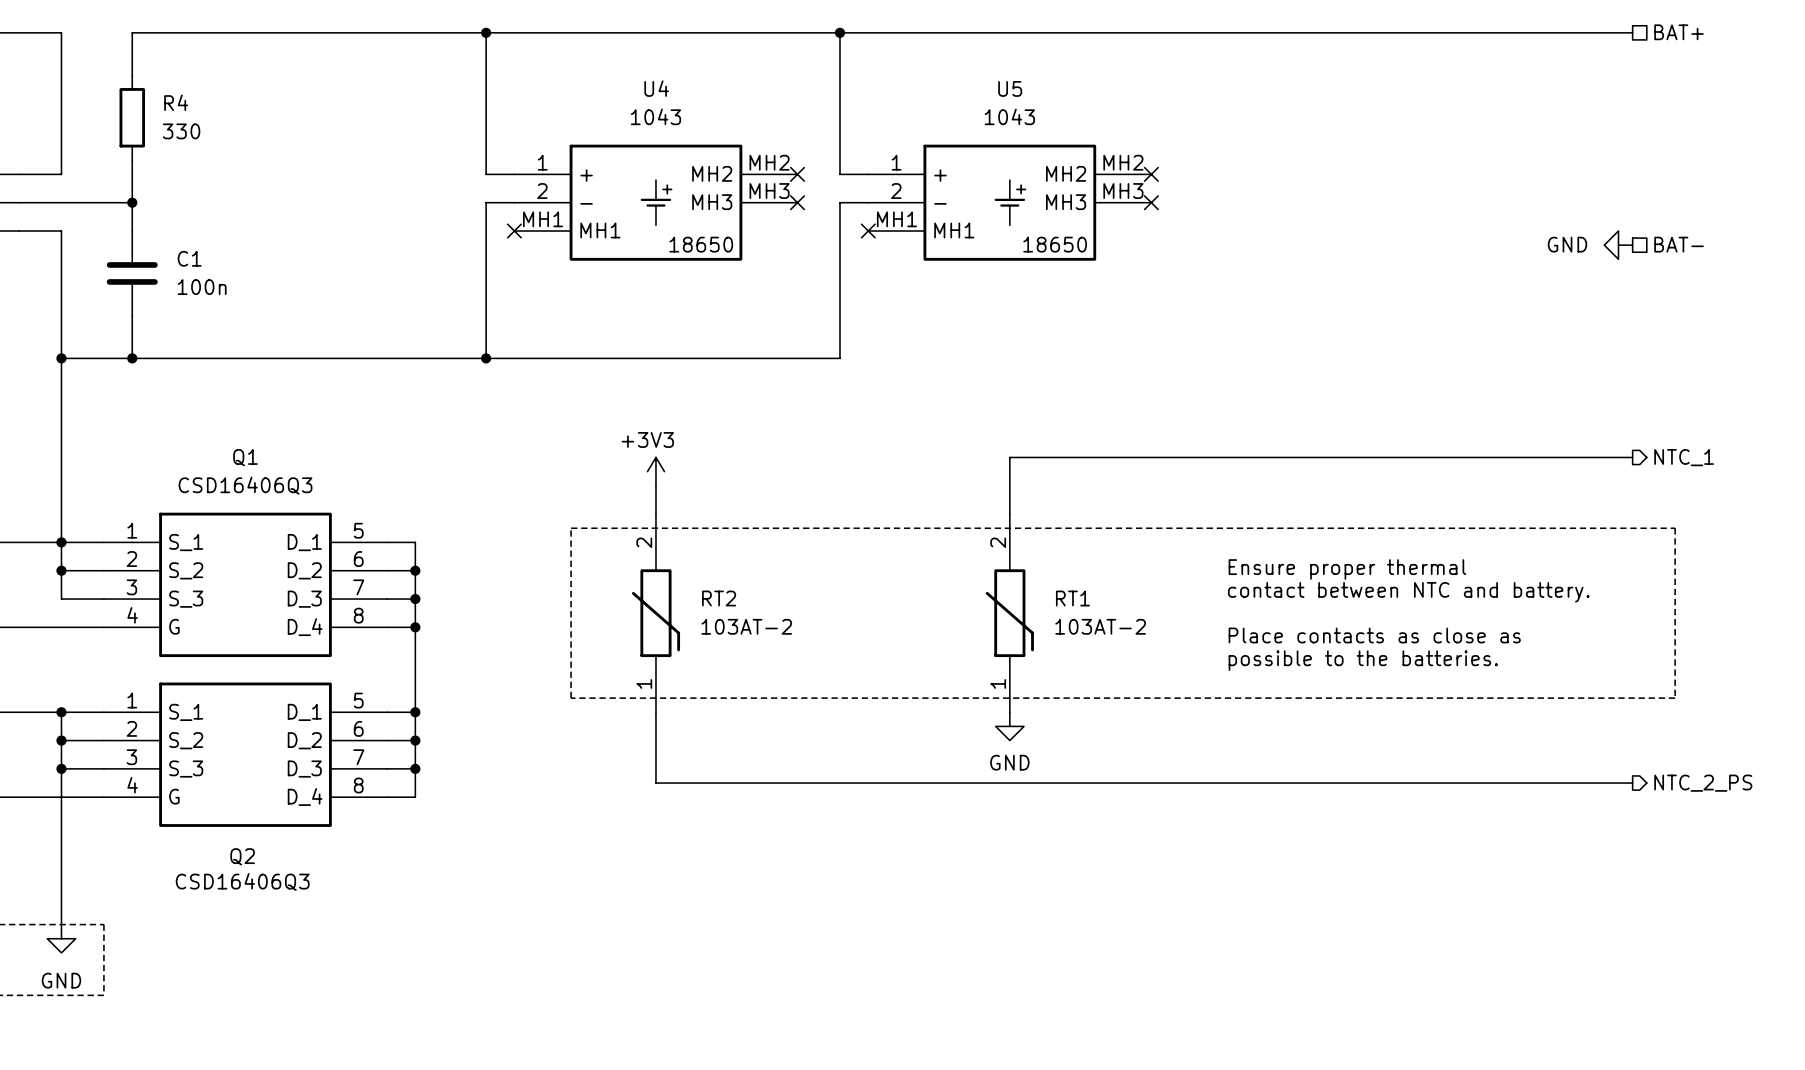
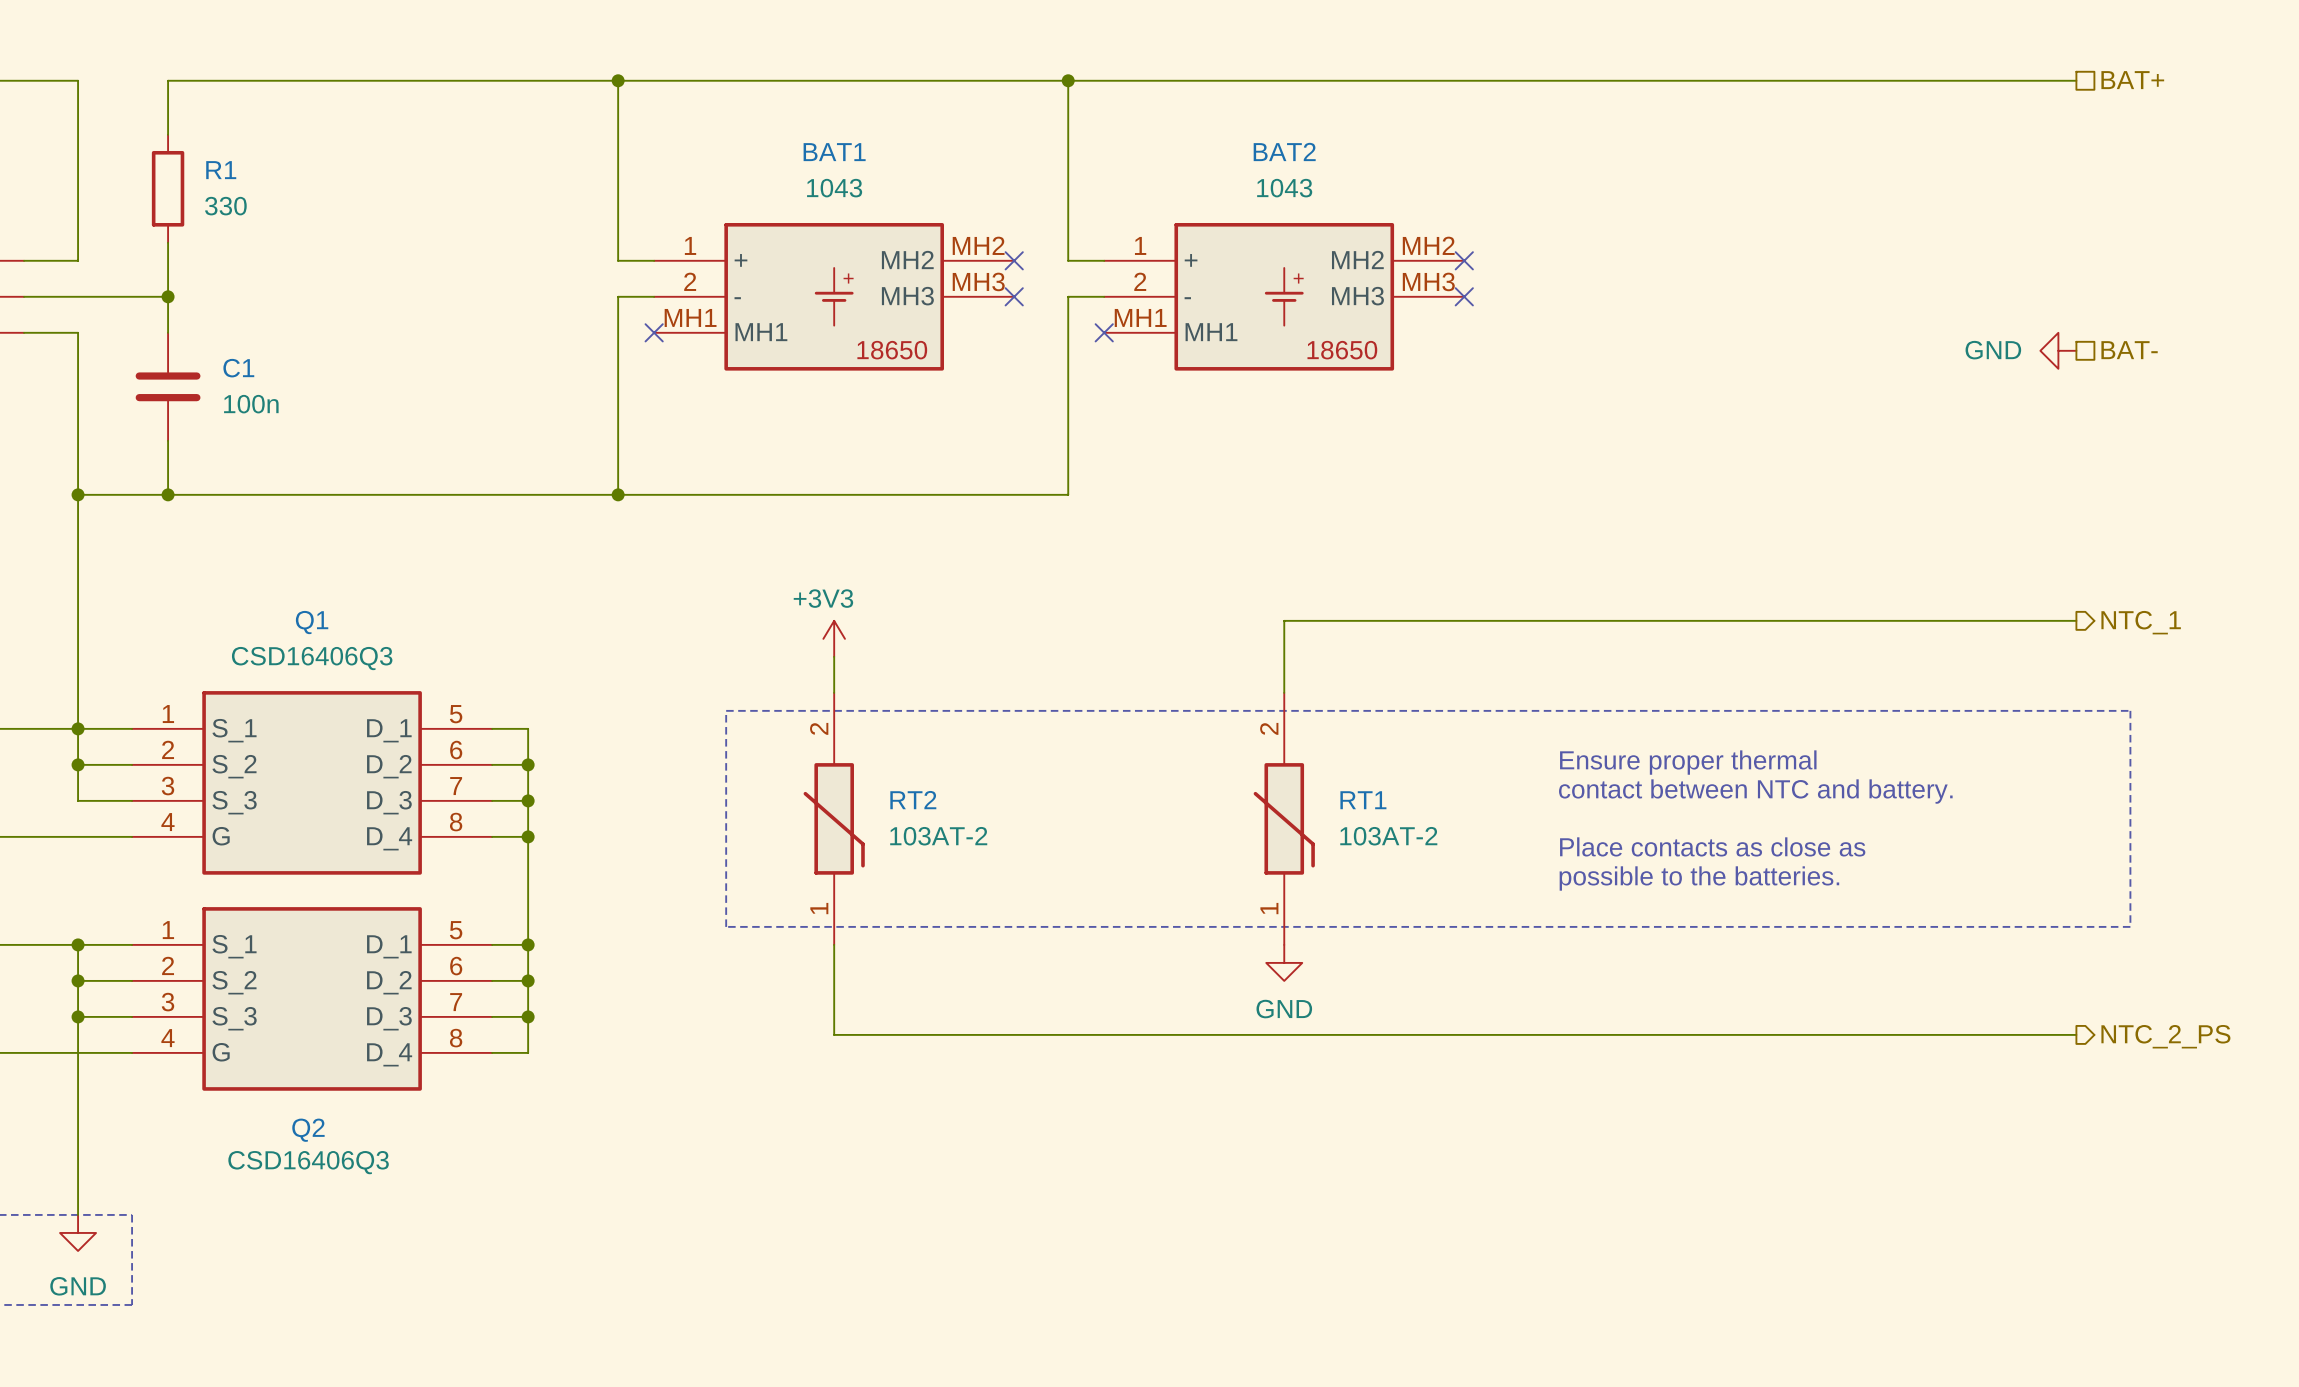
U4 name: U4 (656, 88) -> BAT1 (834, 152)
U5 name: U5 (1010, 88) -> BAT2 (1284, 151)
R4 name: R4 (176, 102) -> R1 (221, 170)

